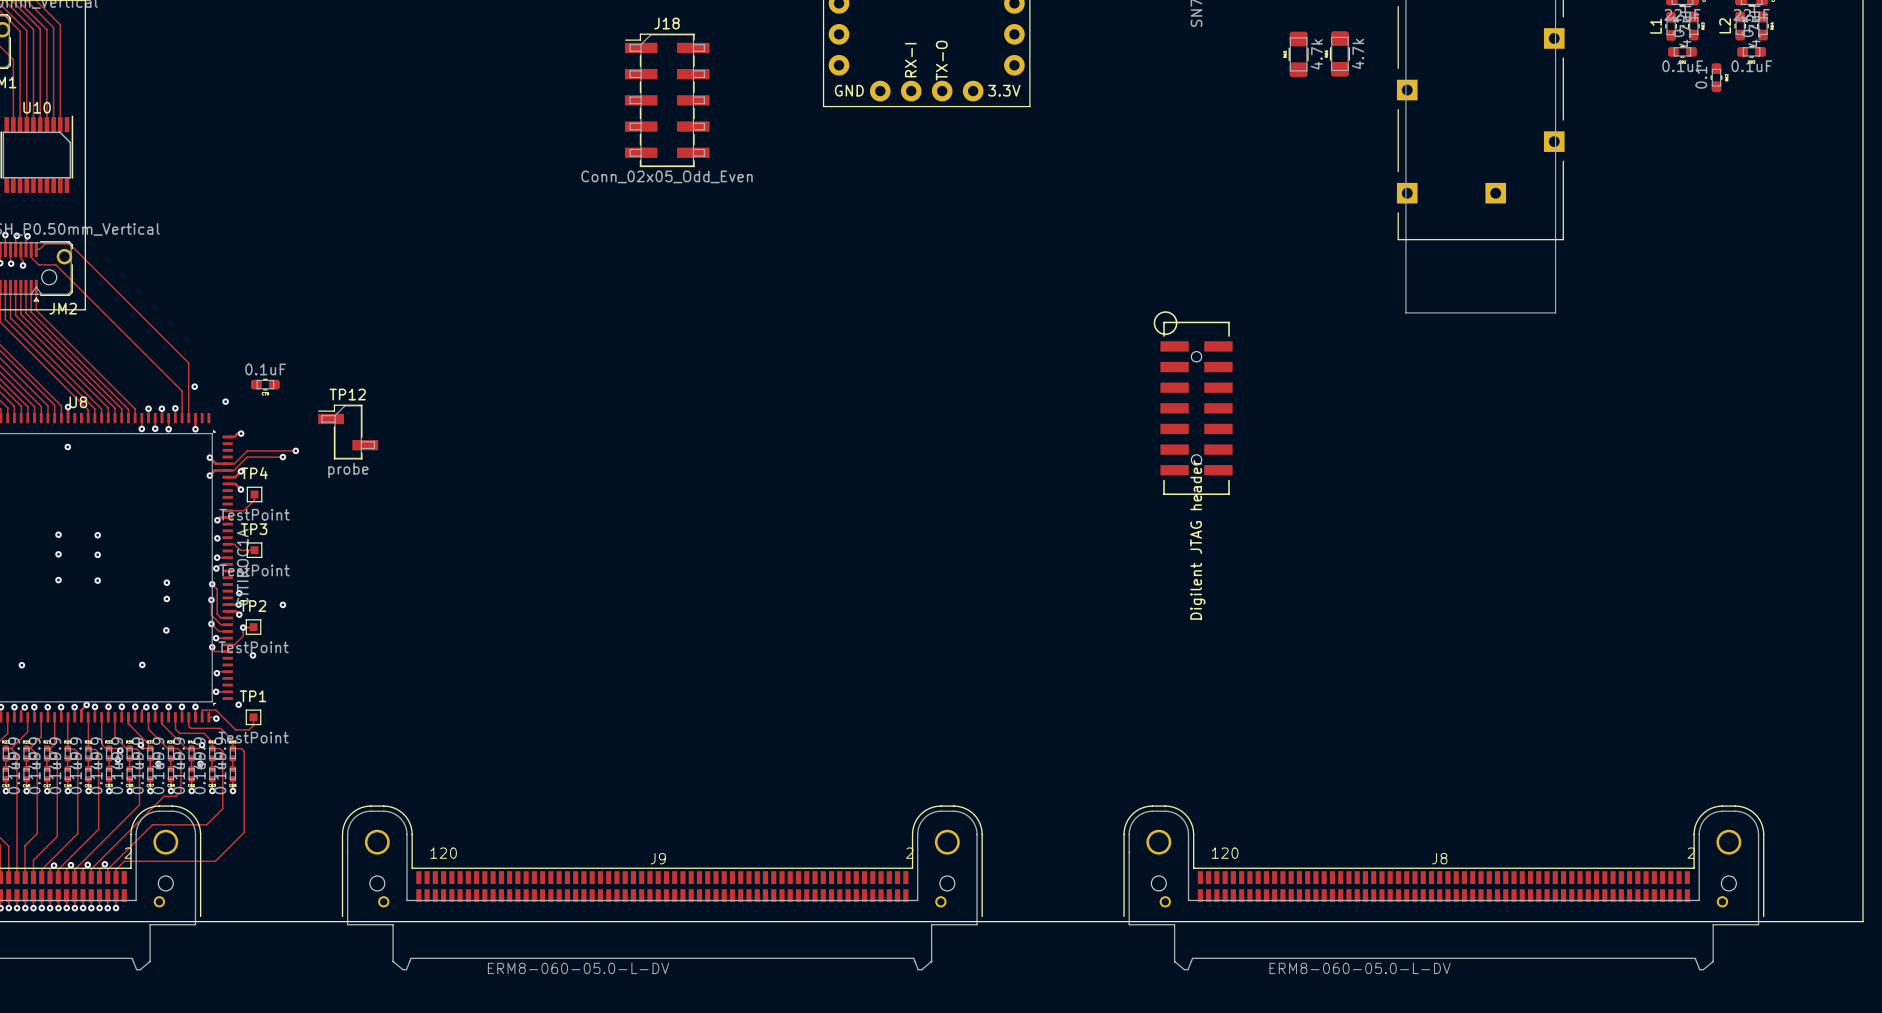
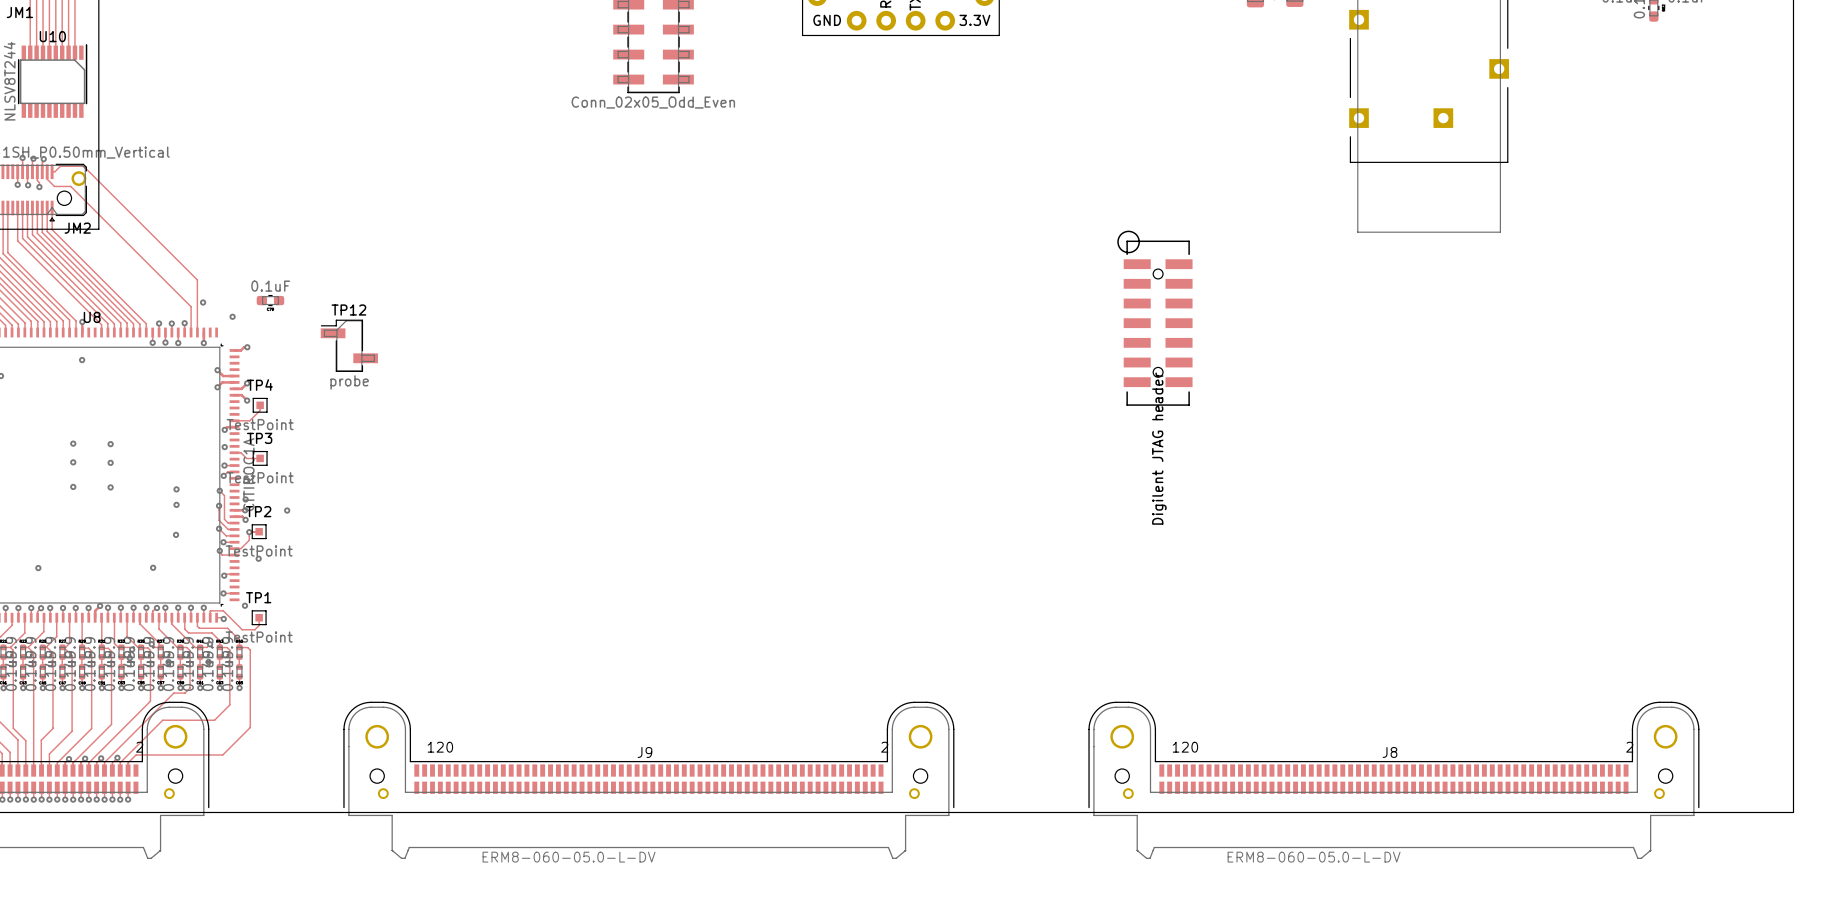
track: (295, 450) (247, 450) (234, 463) (227, 463) -> none
via: (295, 450) -> none
track: (282, 457) (247, 457) (233, 470) (227, 470) -> none
via: (282, 457) -> none

